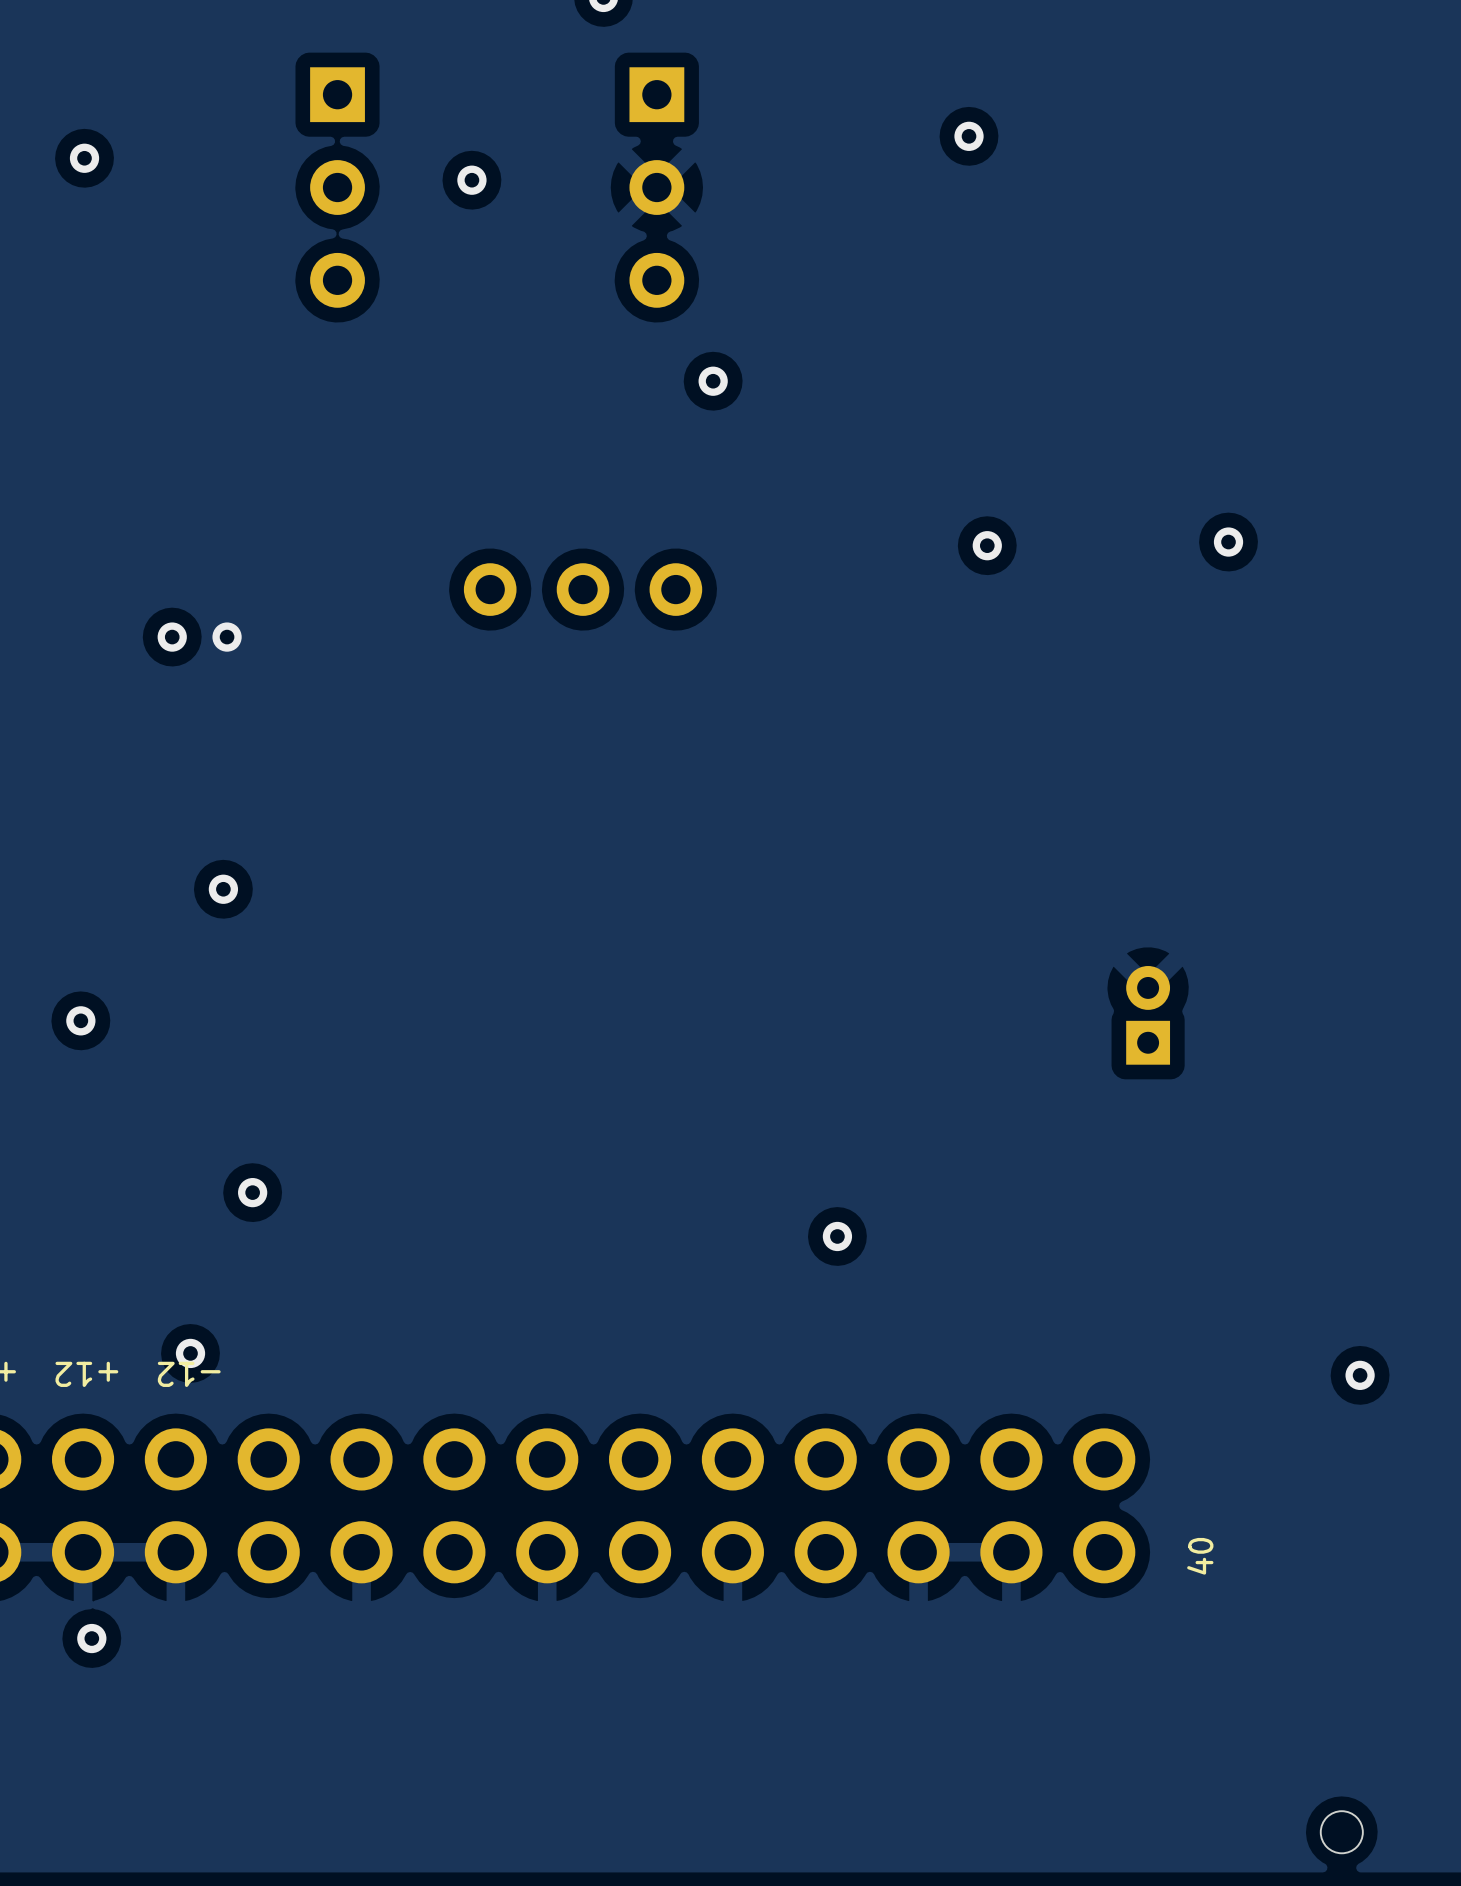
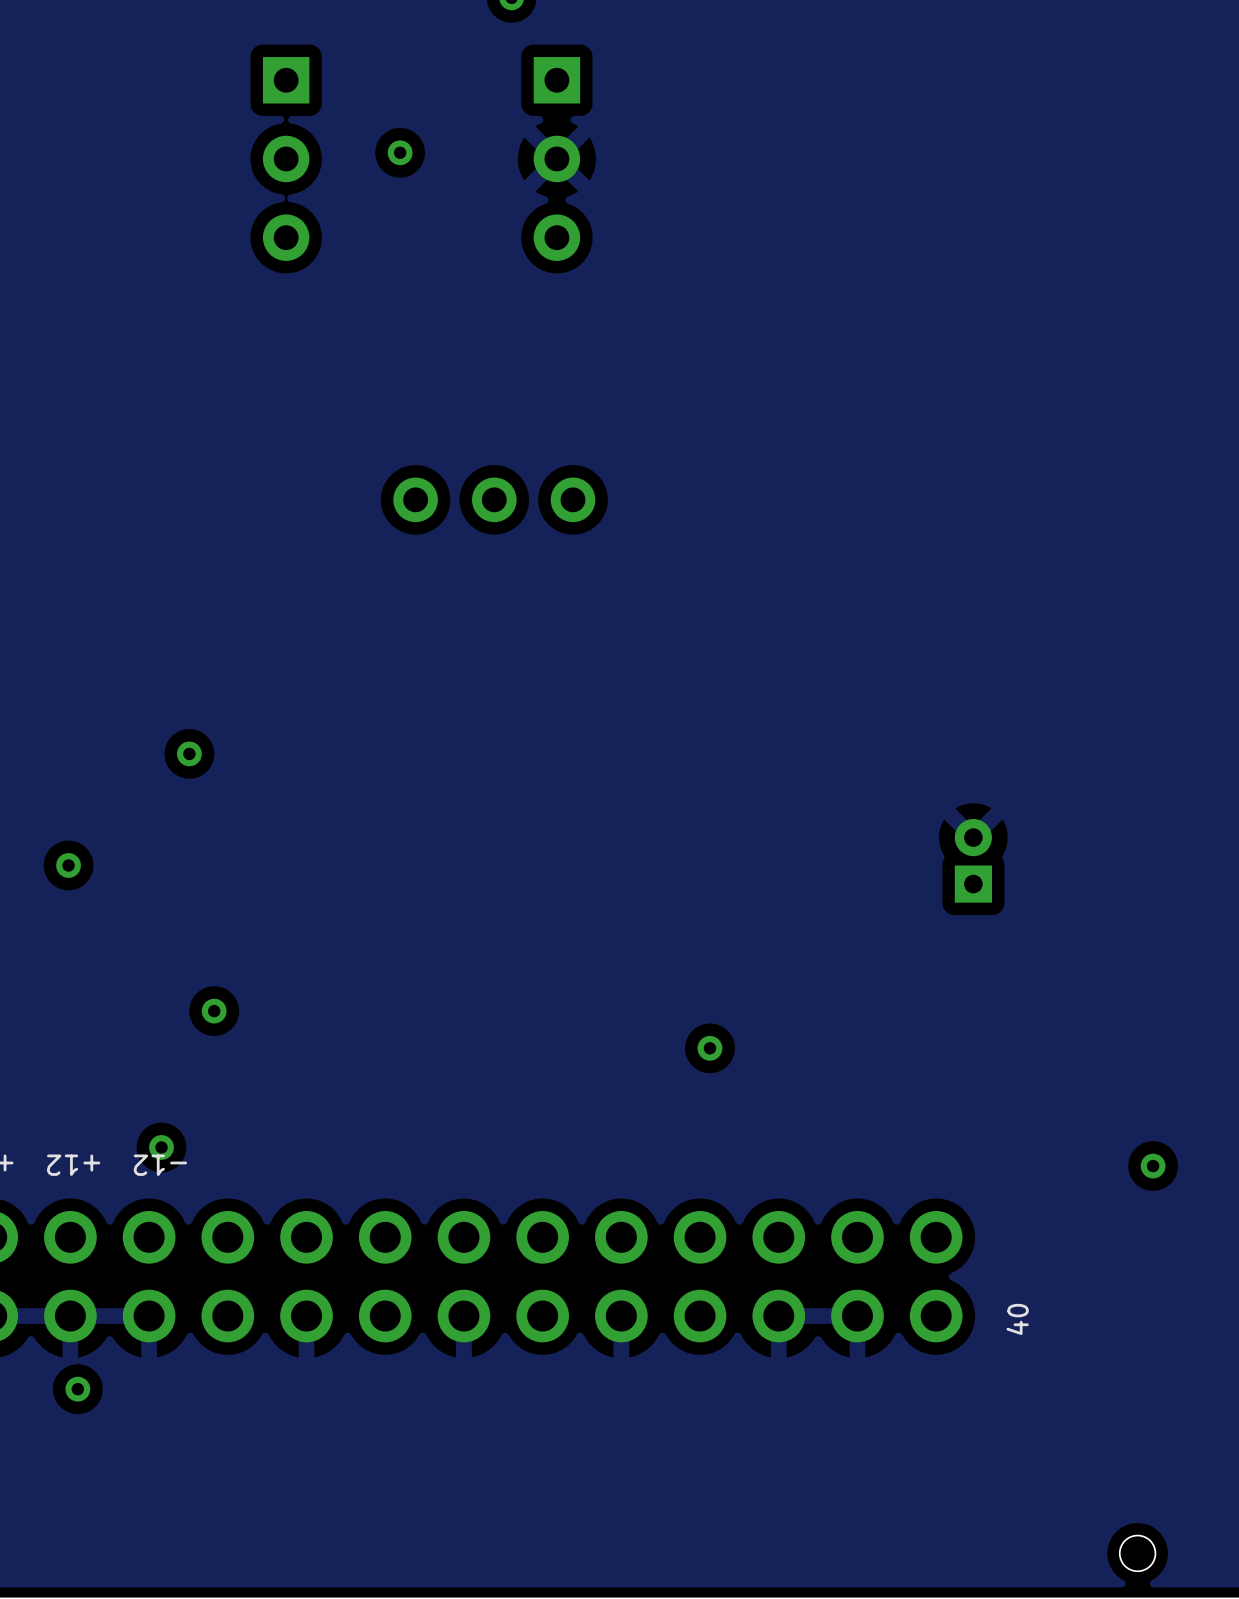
via: (969, 136) -> none
via: (84, 158) -> none
via: (713, 381) -> none
via: (1228, 542) -> none
via: (987, 545) -> none
via: (172, 637) -> none
via: (227, 637) -> none

